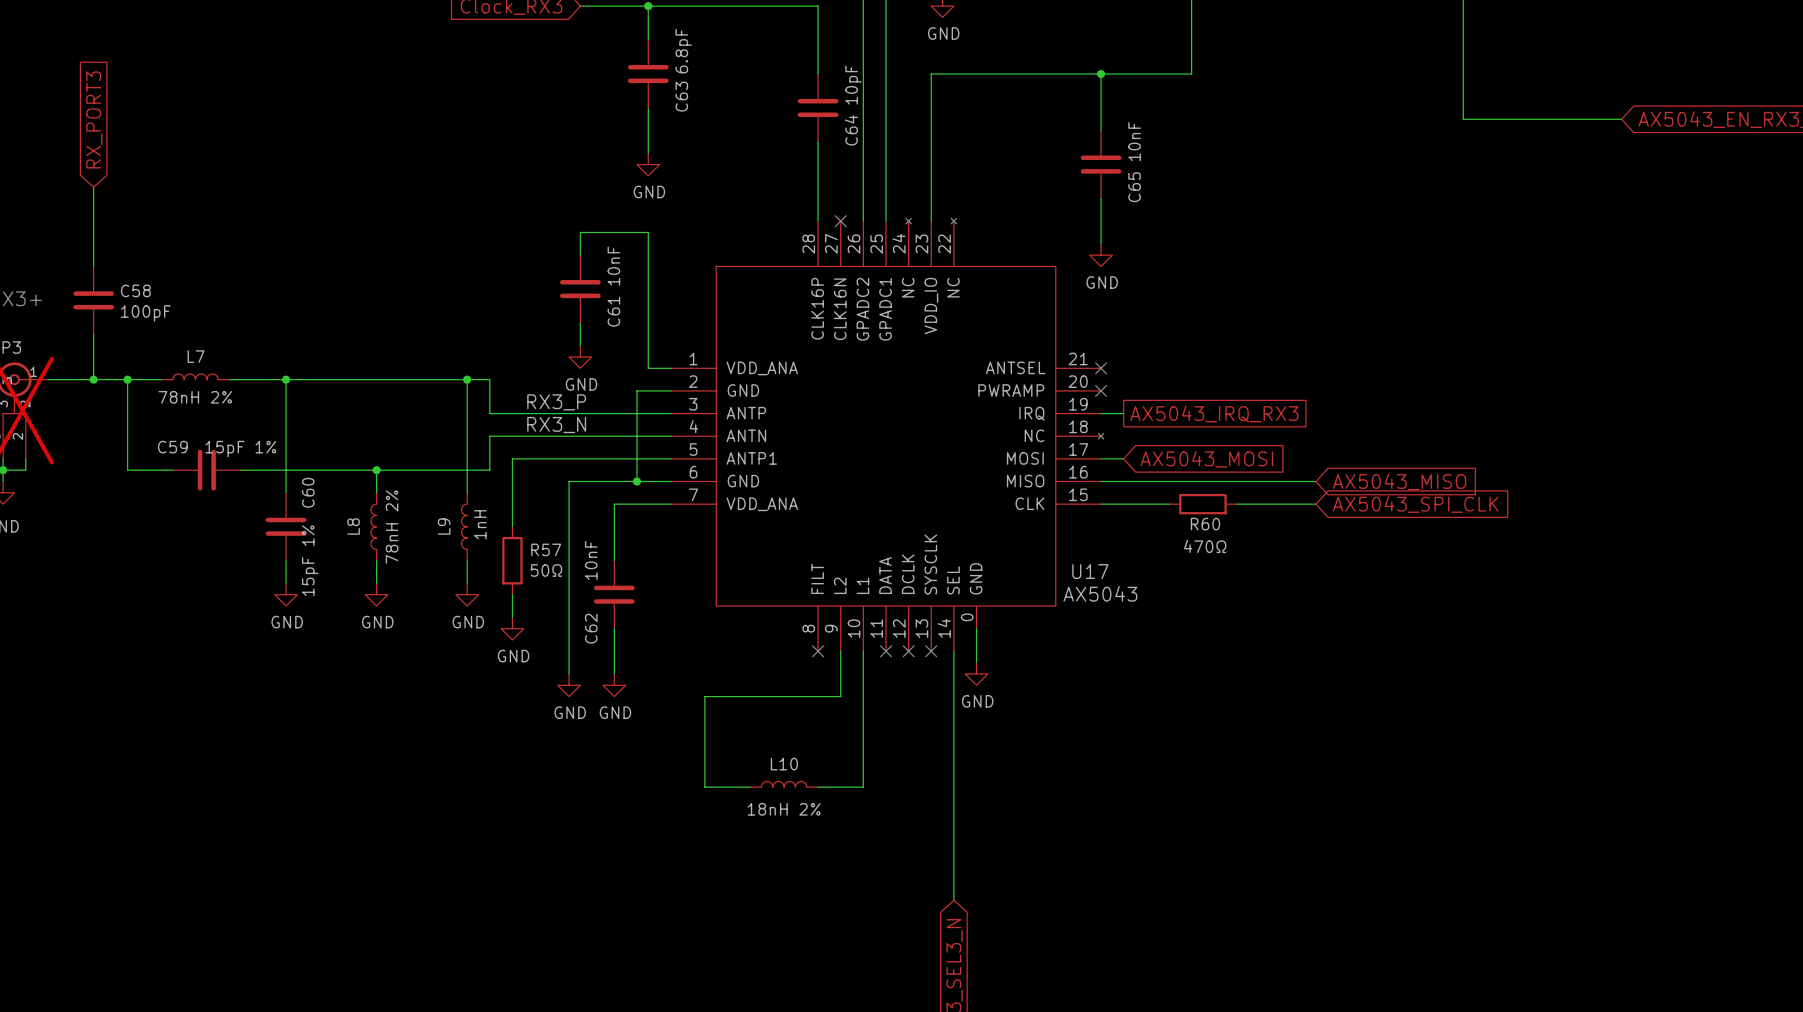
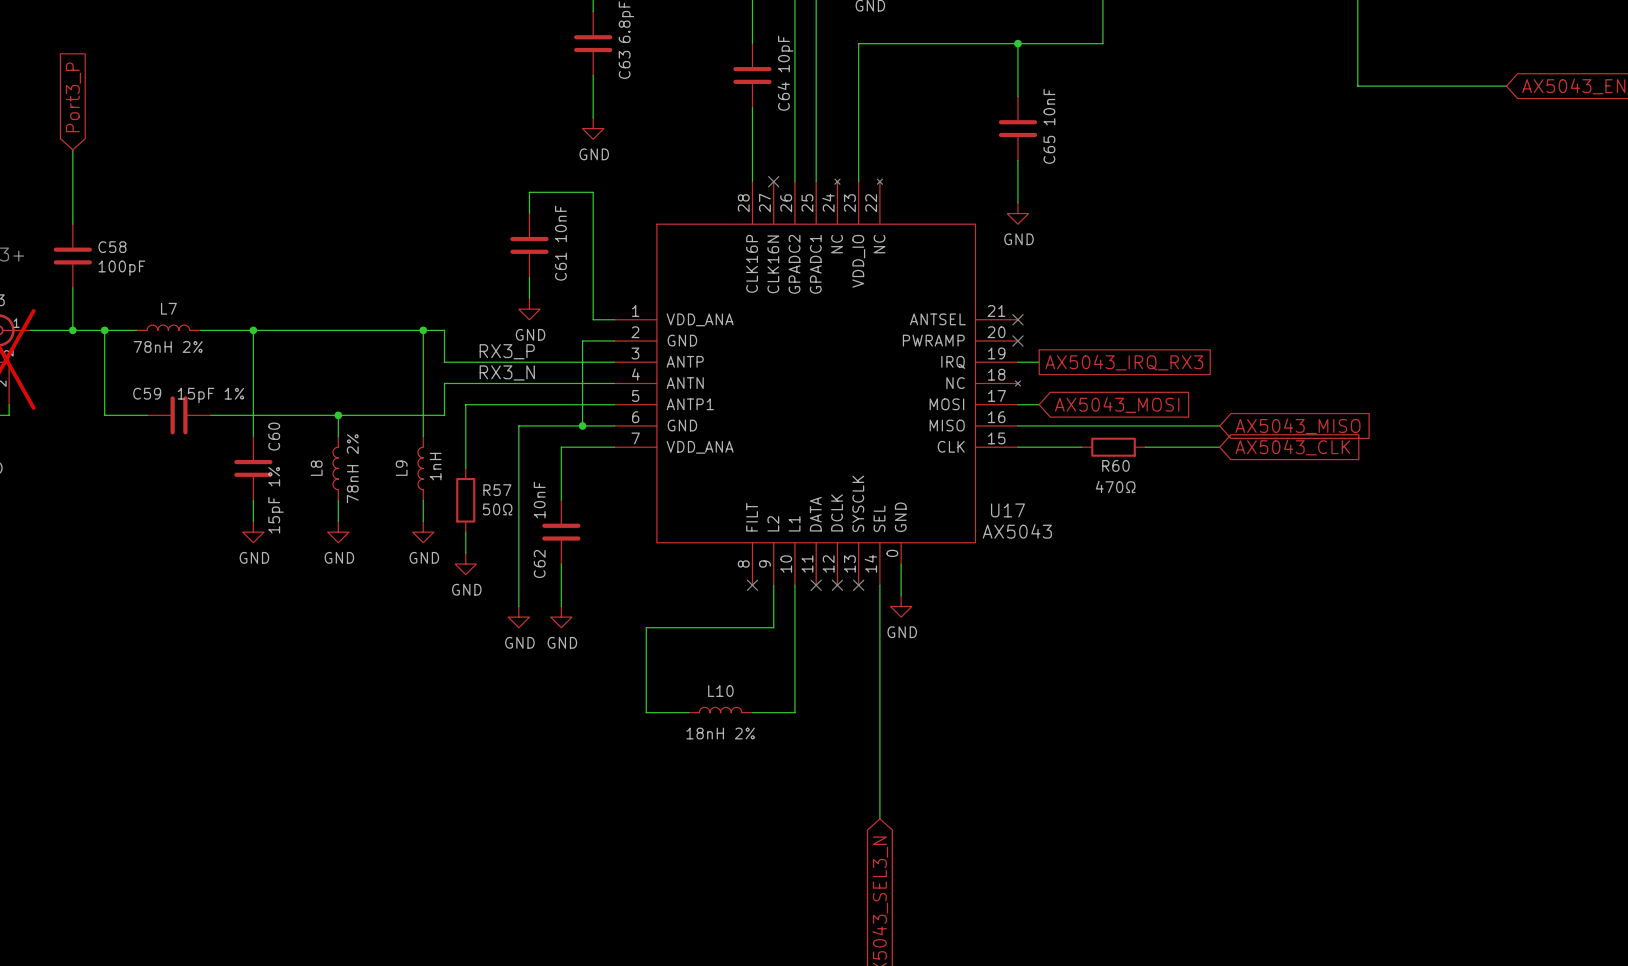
global label: RX_PORT3 (94, 119) -> Port3_P (73, 97)
global label: AX5043_SPI_CLK (1415, 504) -> AX5043_CLK (1292, 447)

